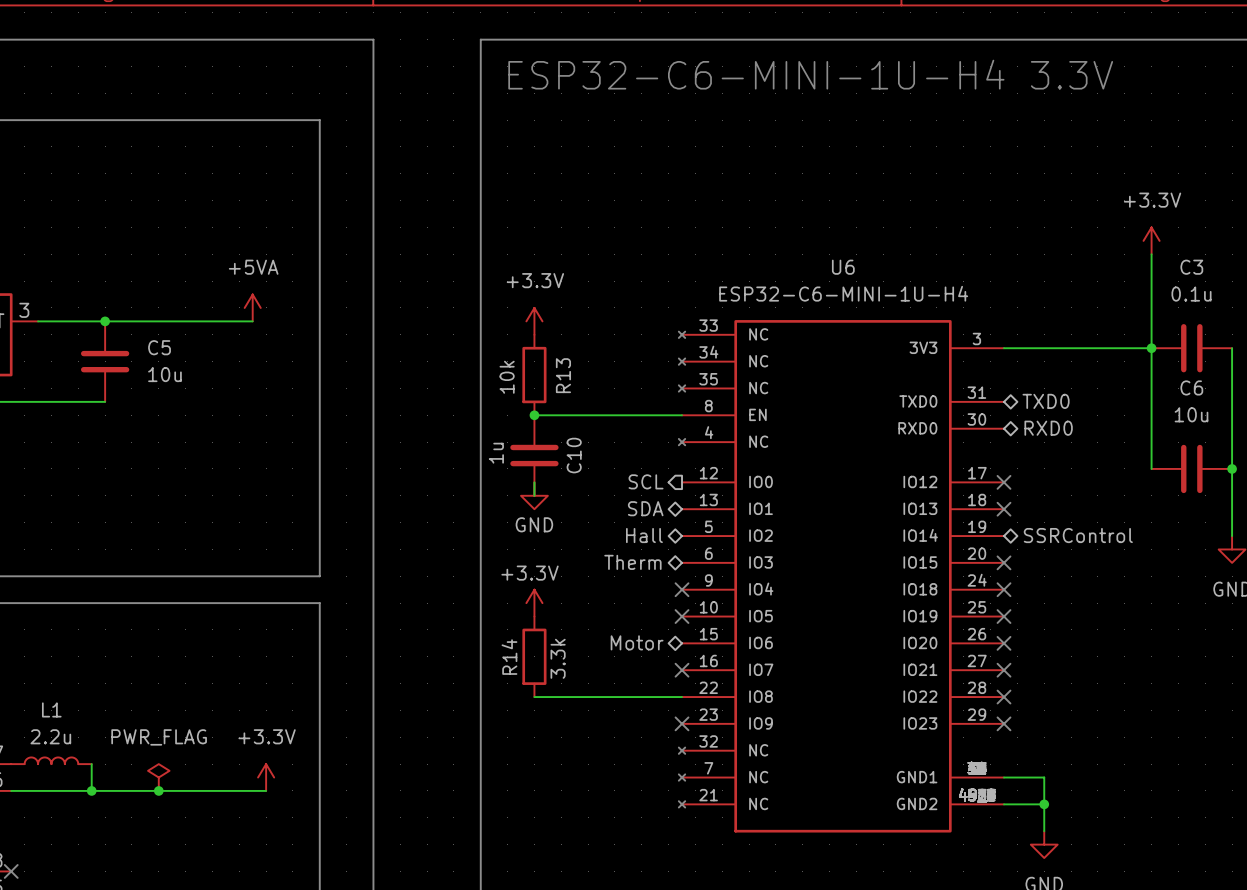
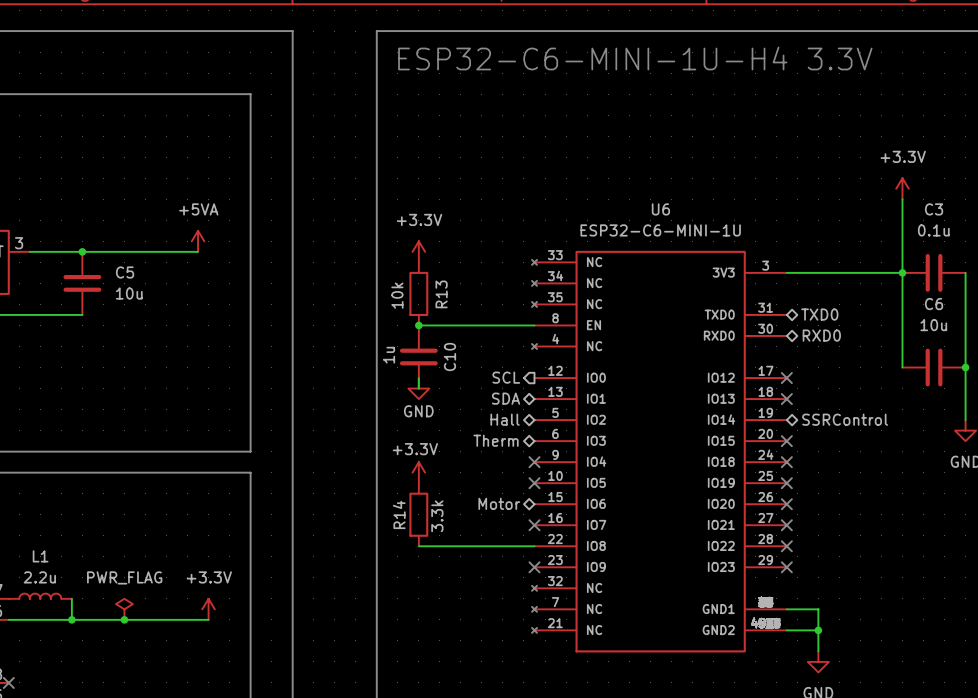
U6 value: ESP32-C6-MINI-1U-H4 (843, 293) -> ESP32-C6-MINI-1U (660, 230)

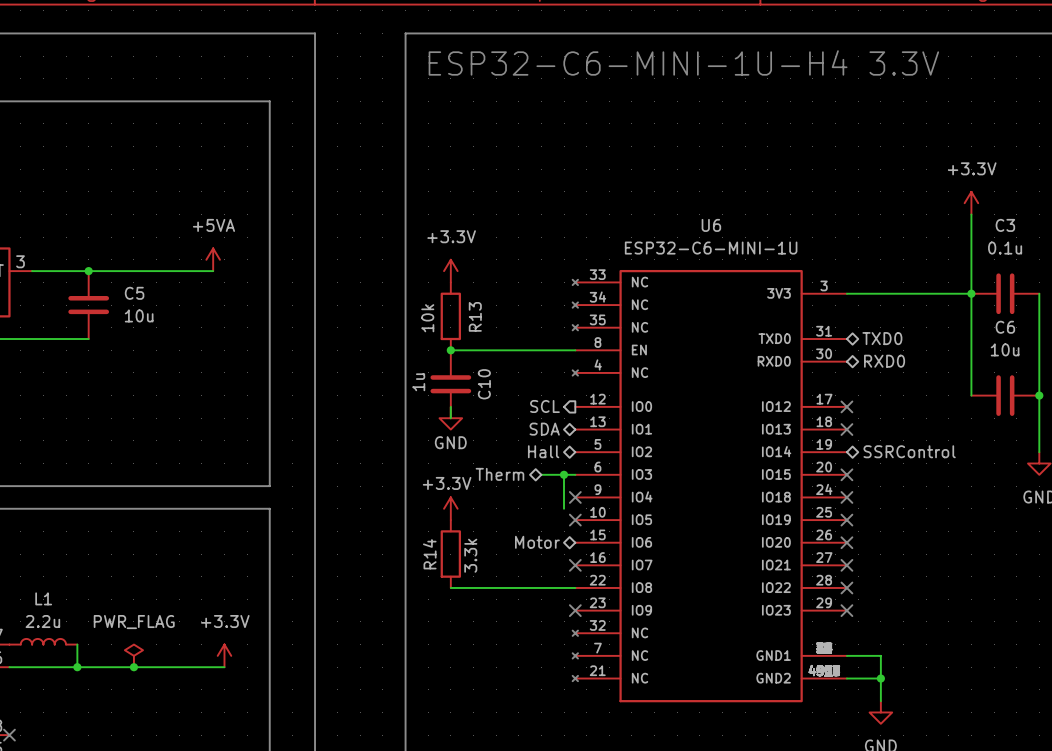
hierarchical label position: Therm (496, 440) -> Therm (499, 474)
wire: none -> (541, 474) (575, 474)
wire: none -> (564, 474) (564, 508)
junction: none -> (564, 474)

